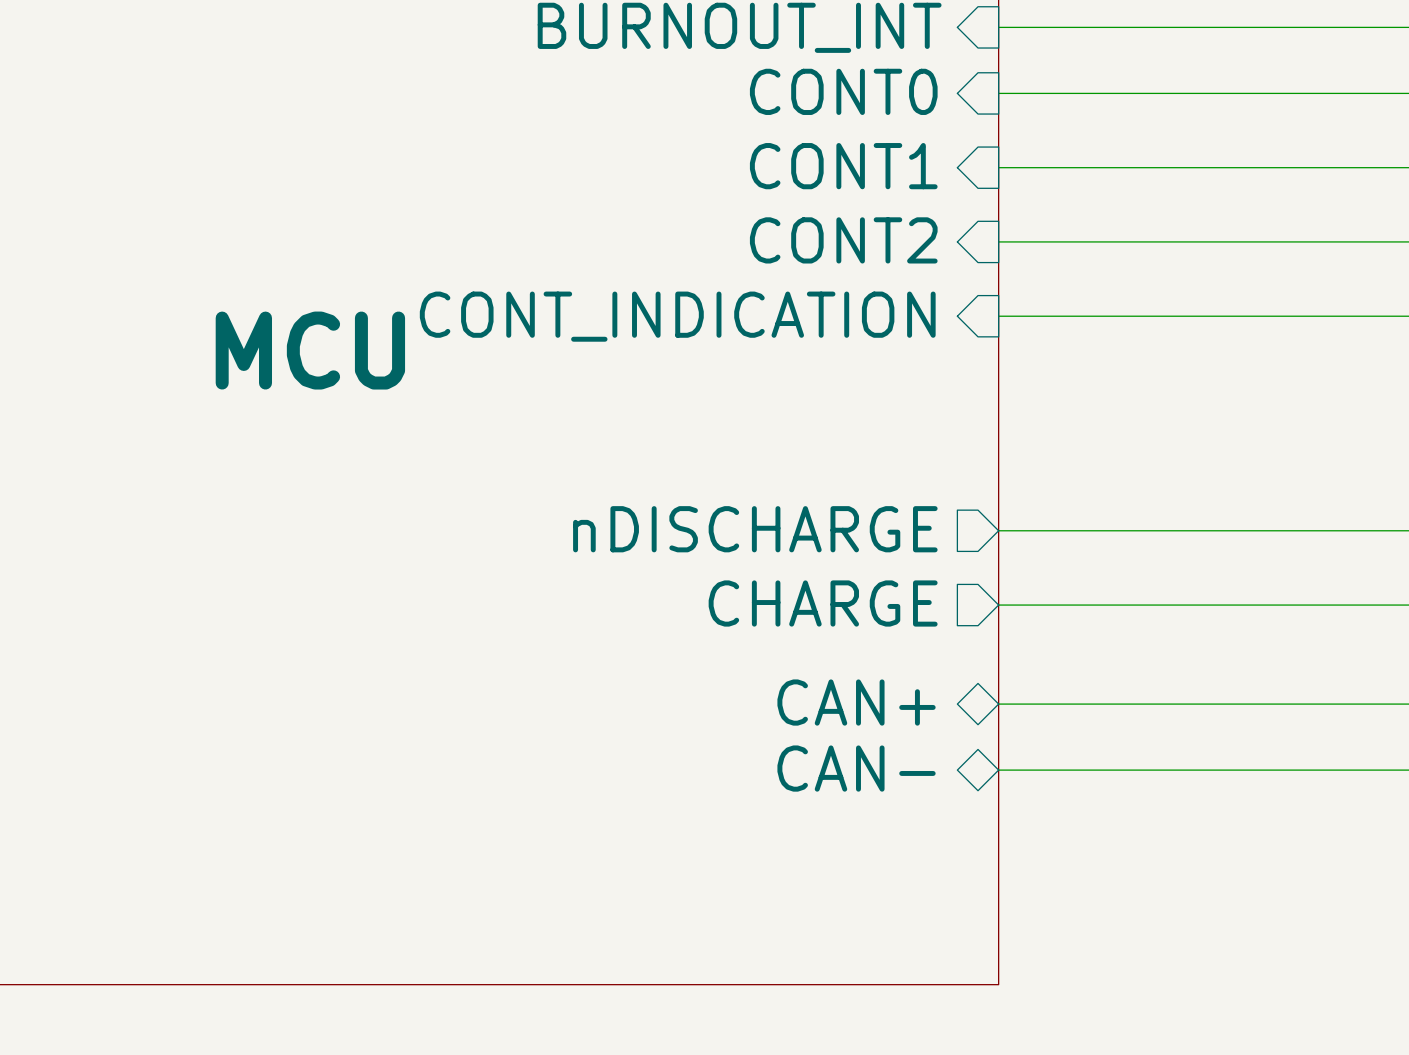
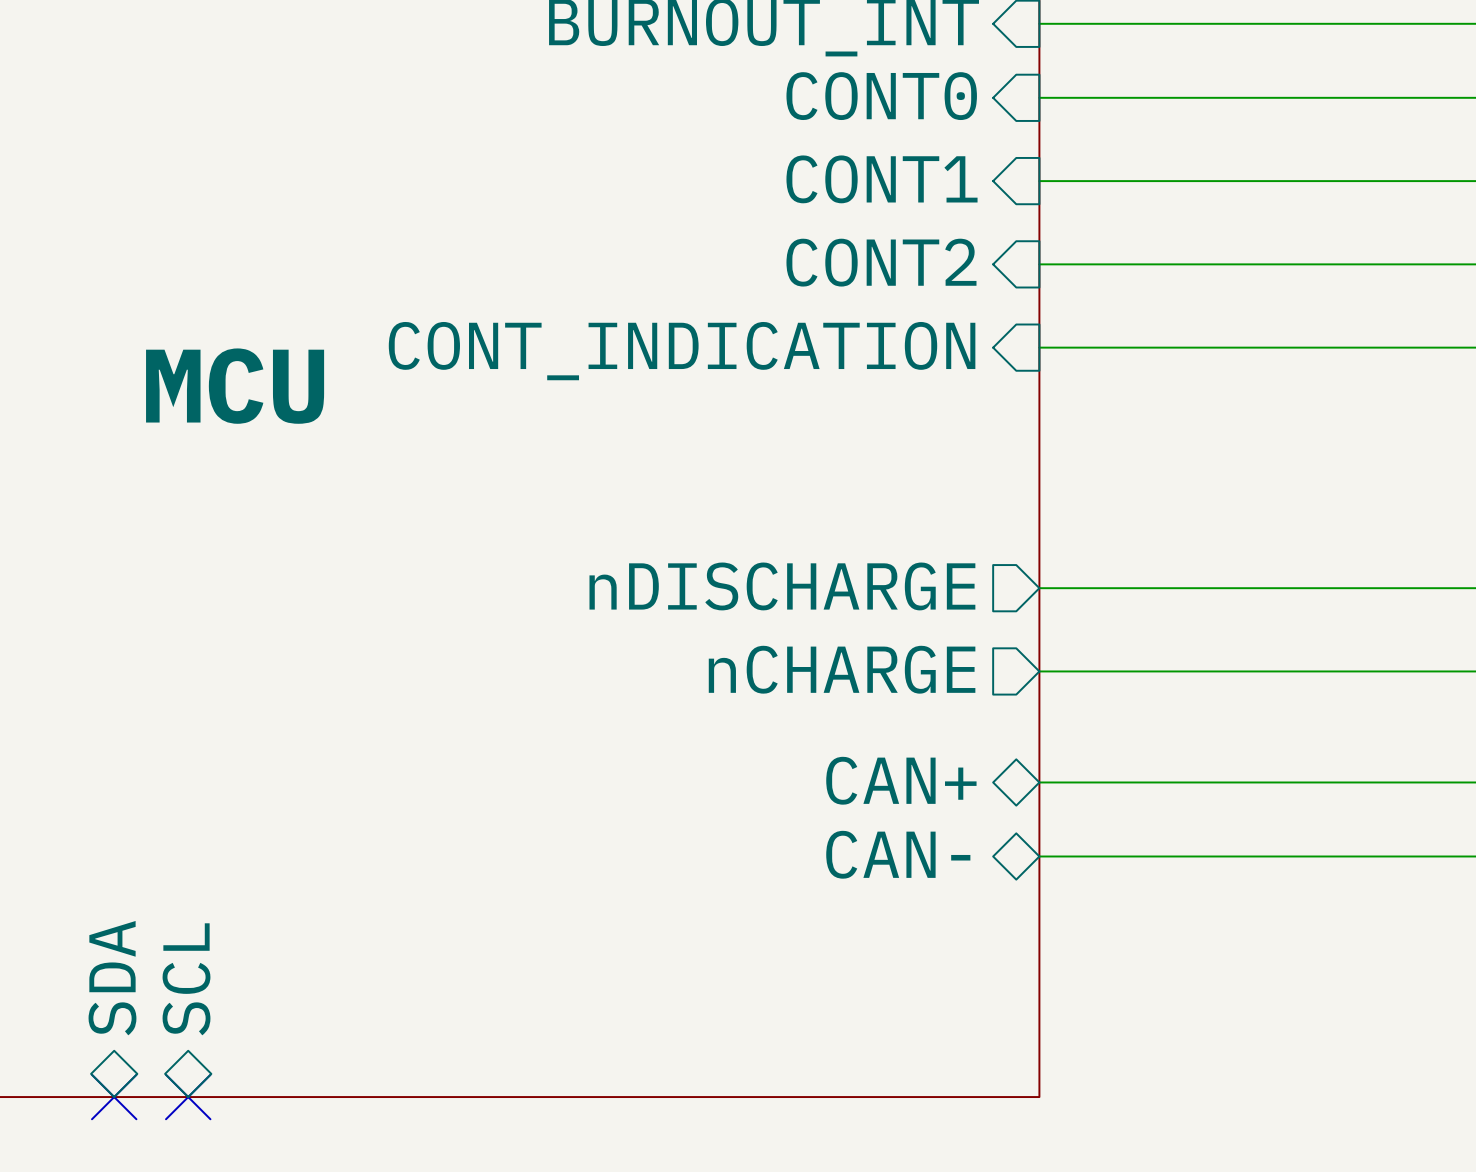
sheet pin: CHARGE (823, 603) -> nCHARGE (842, 669)
sheet pin: none -> SDA (112, 978)
sheet pin: none -> SCL (186, 979)
no-connect mark: none -> (114, 1097)
no-connect mark: none -> (188, 1097)

